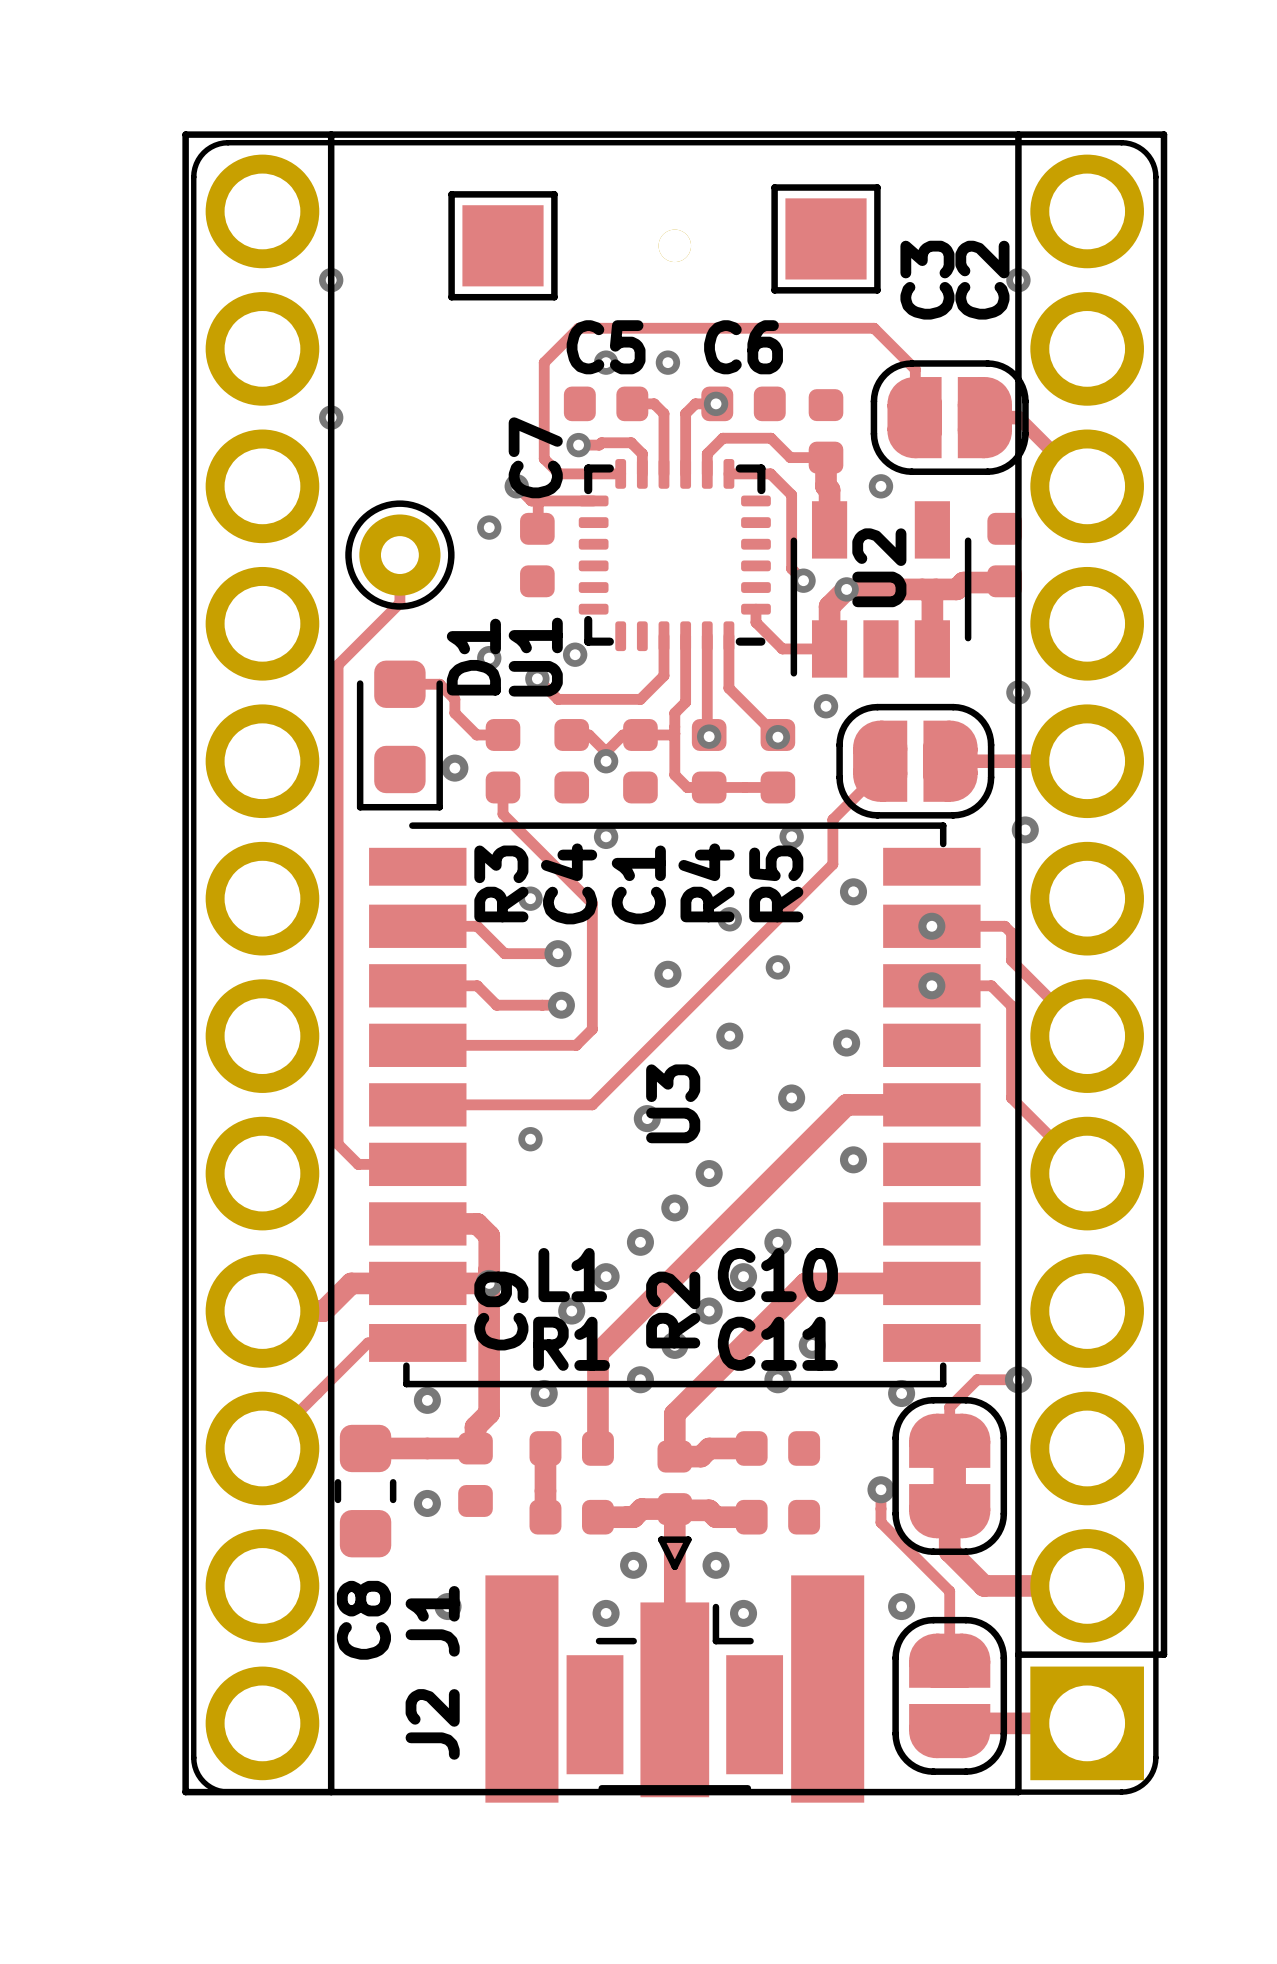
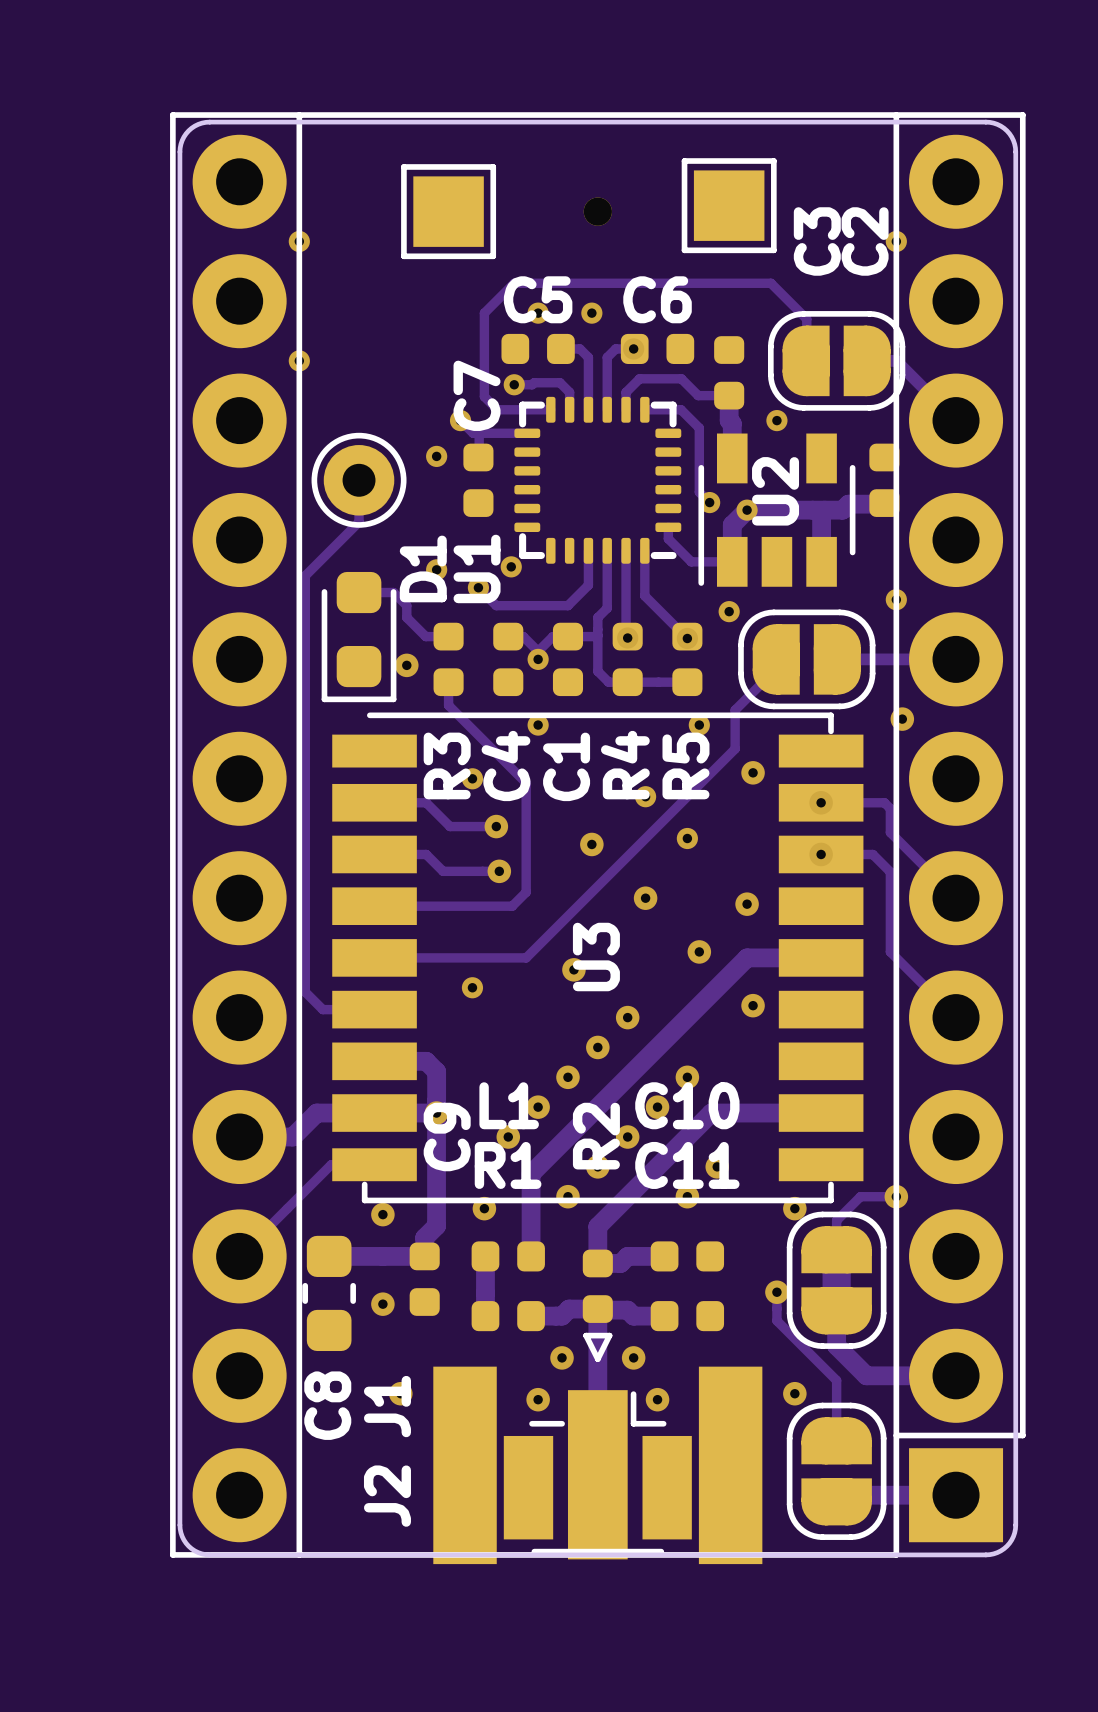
part footprint: [182, 131, 1168, 1796] -> [170, 112, 1026, 1558]

